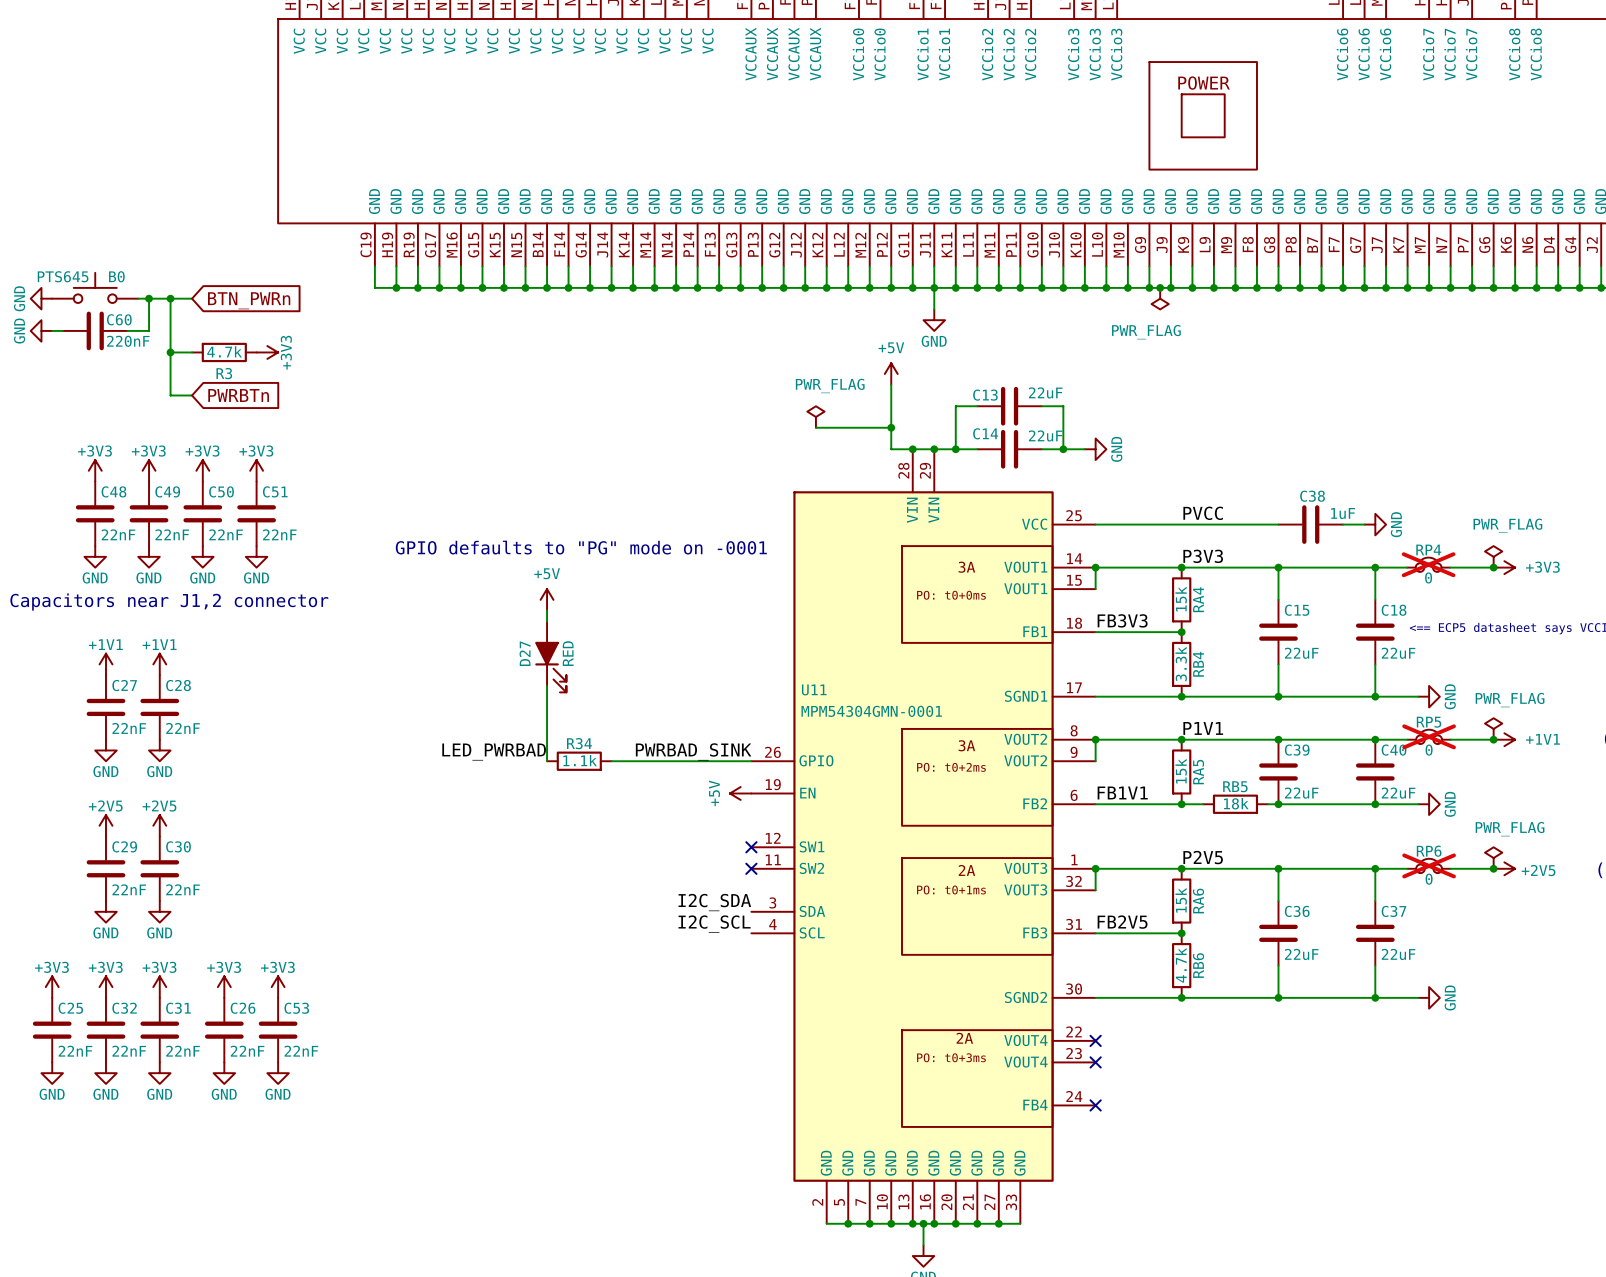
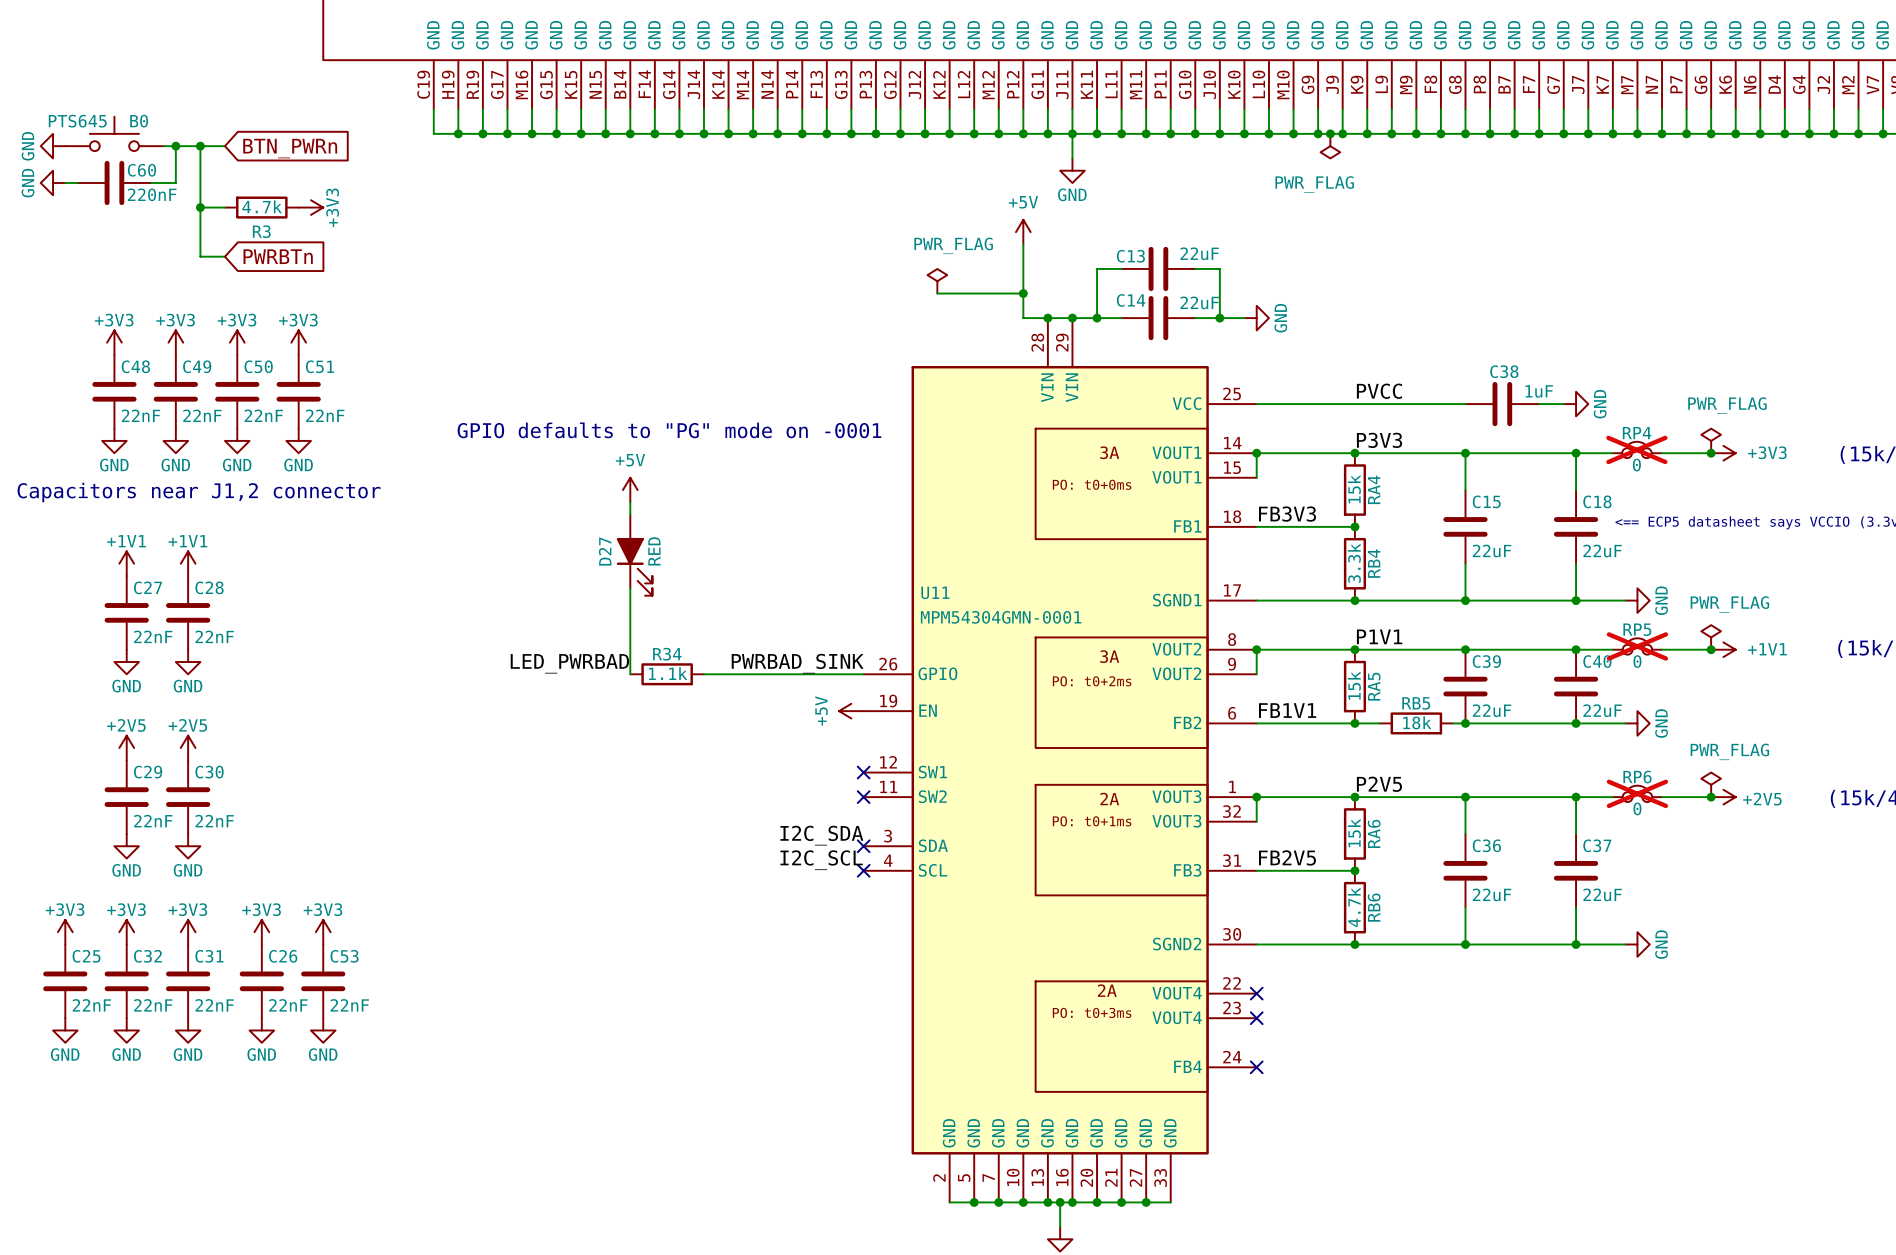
no-connect mark: none -> (863, 846)
no-connect mark: none -> (863, 870)

